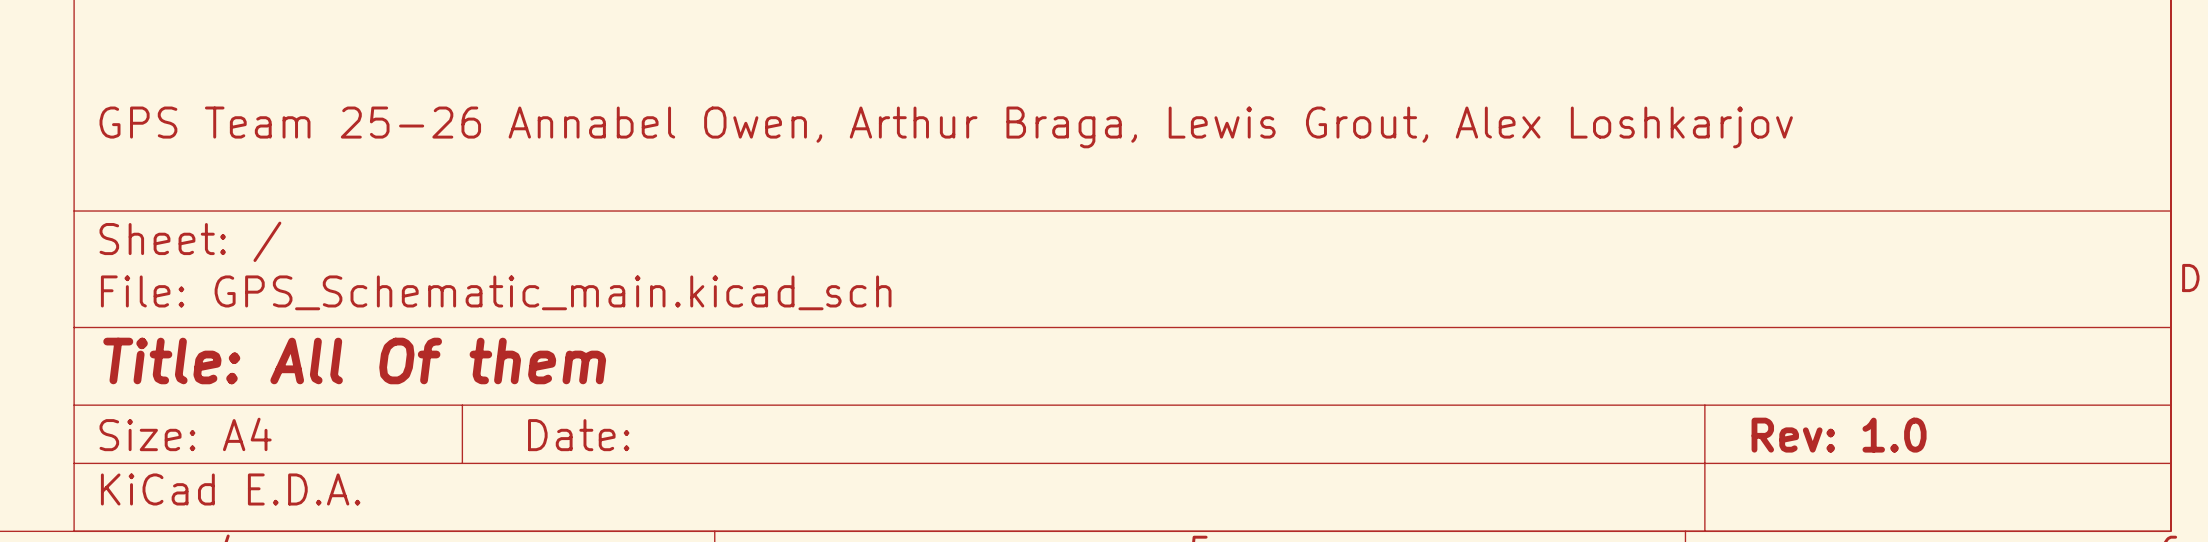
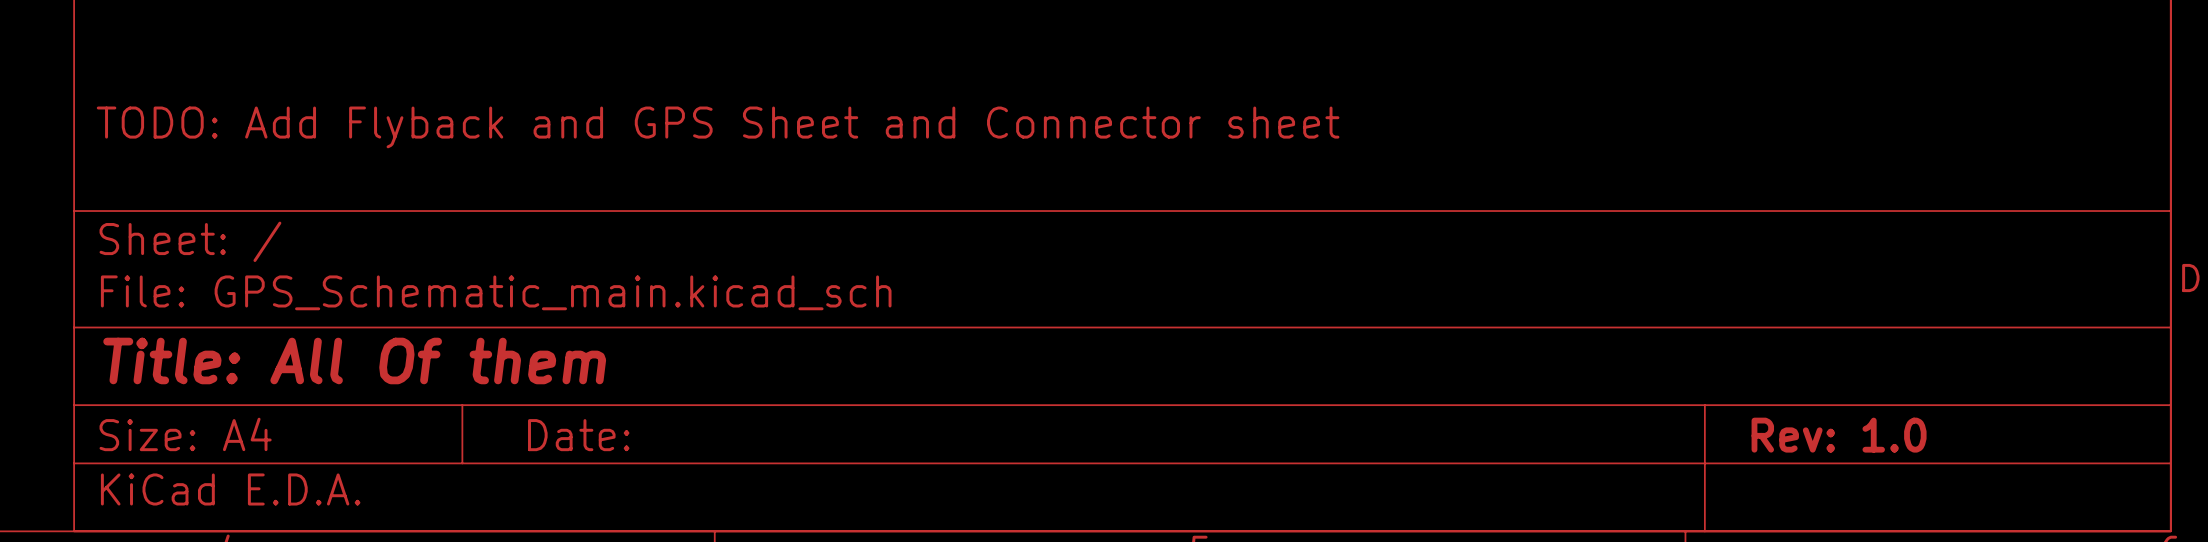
title block: GPS Team 25-26 Annabel Owen, Arthur Braga, Lewis Grout, Alex Loshkarjov (946, 127) -> TODO: Add Flyback and GPS Sheet and Connector sheet (718, 127)

